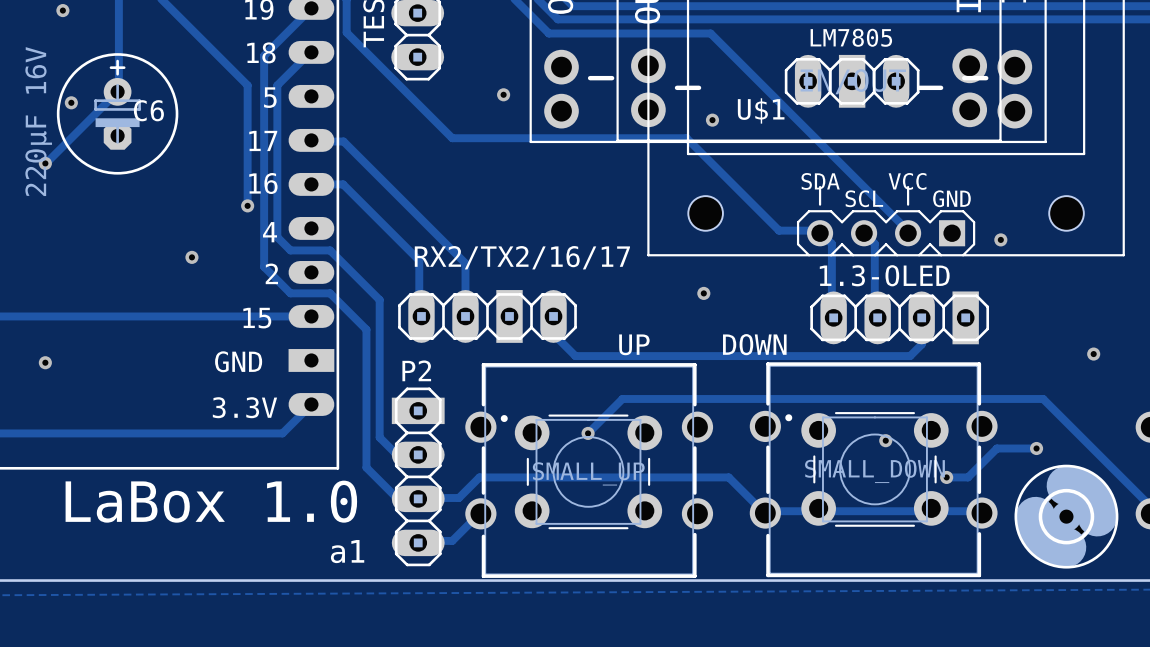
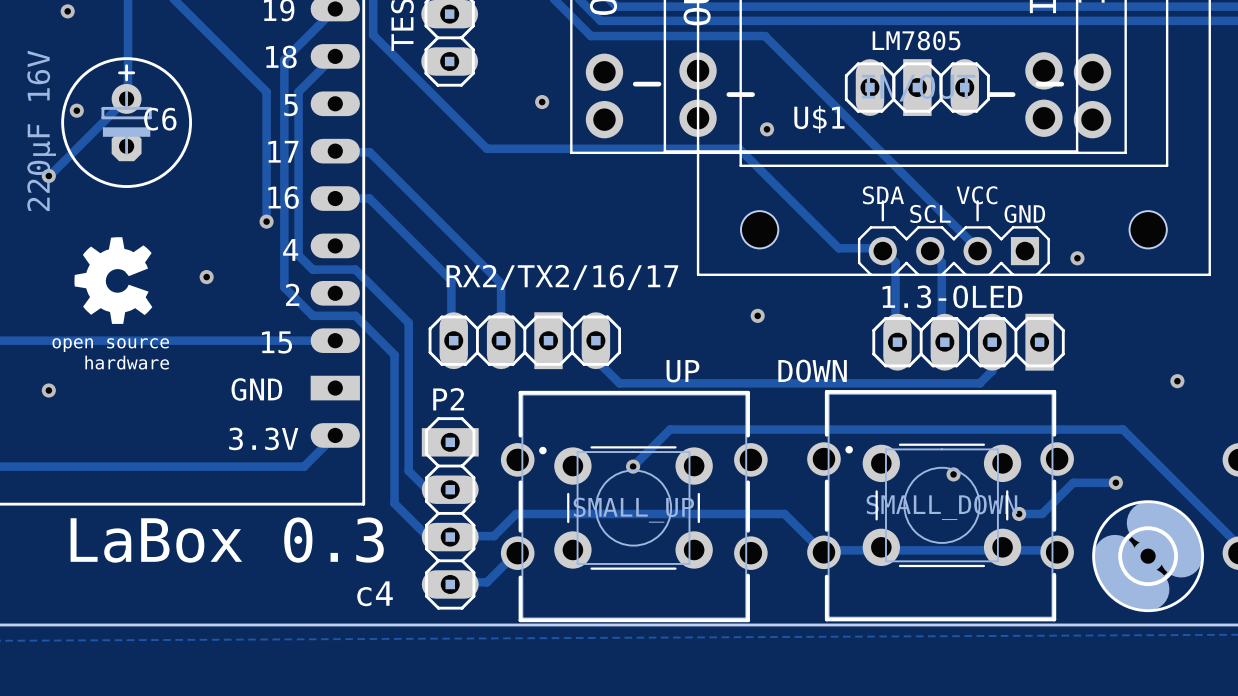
drawing: none -> [74, 237, 153, 324]
text: LaBox 1.0 (211, 501) -> LaBox 0.3 (227, 540)
text: a1 (347, 551) -> c4 (375, 593)

